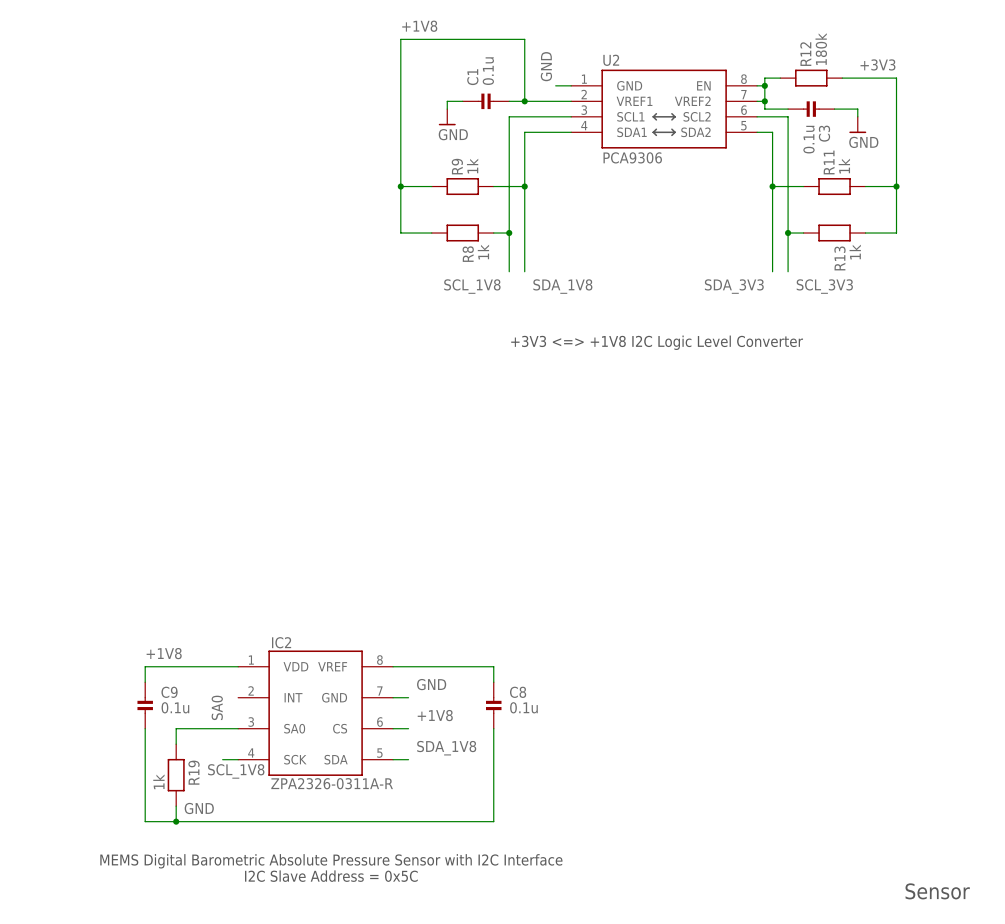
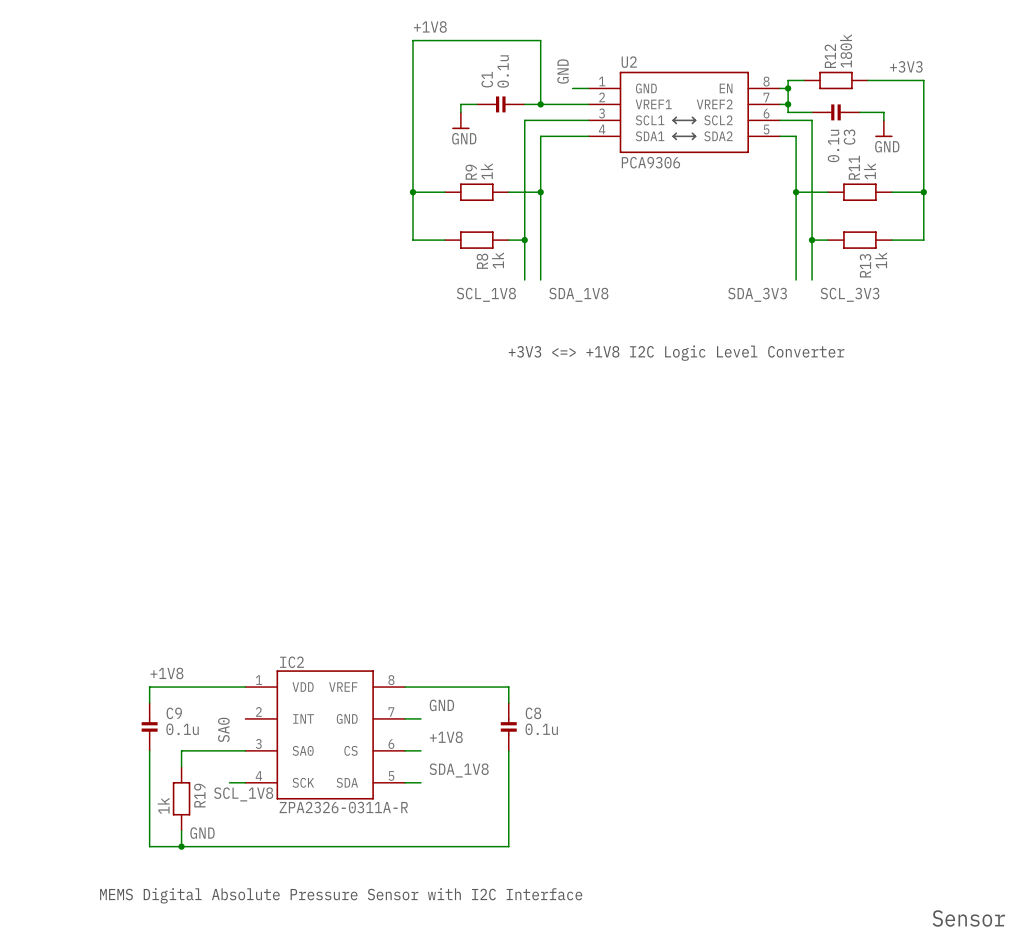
text: MEMS Digital Barometric Absolute Pressure Sensor with I2C Interface (331, 861) -> MEMS Digital Absolute Pressure Sensor with I2C Interface (341, 895)
text: I2C Slave Address = 0x5C (331, 876) -> none

